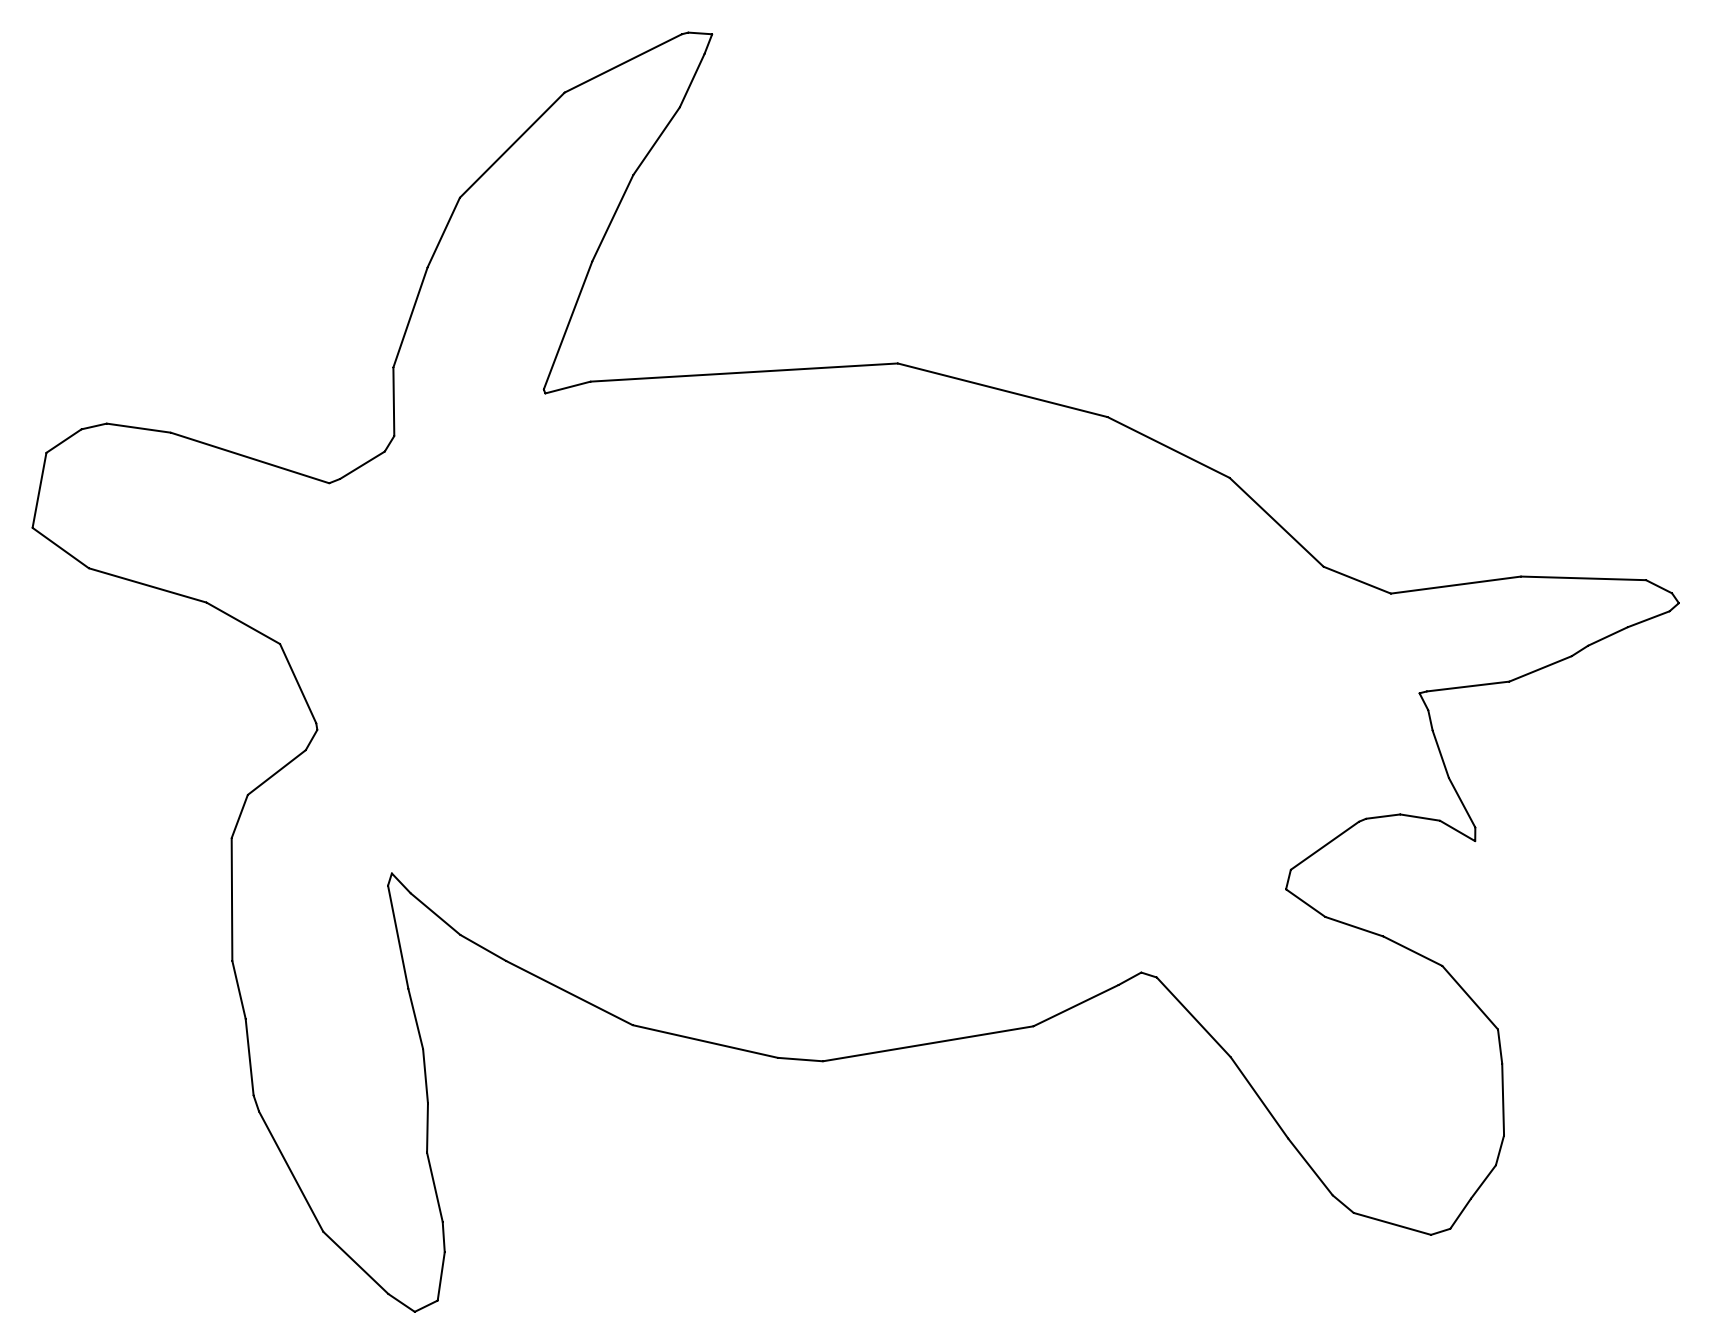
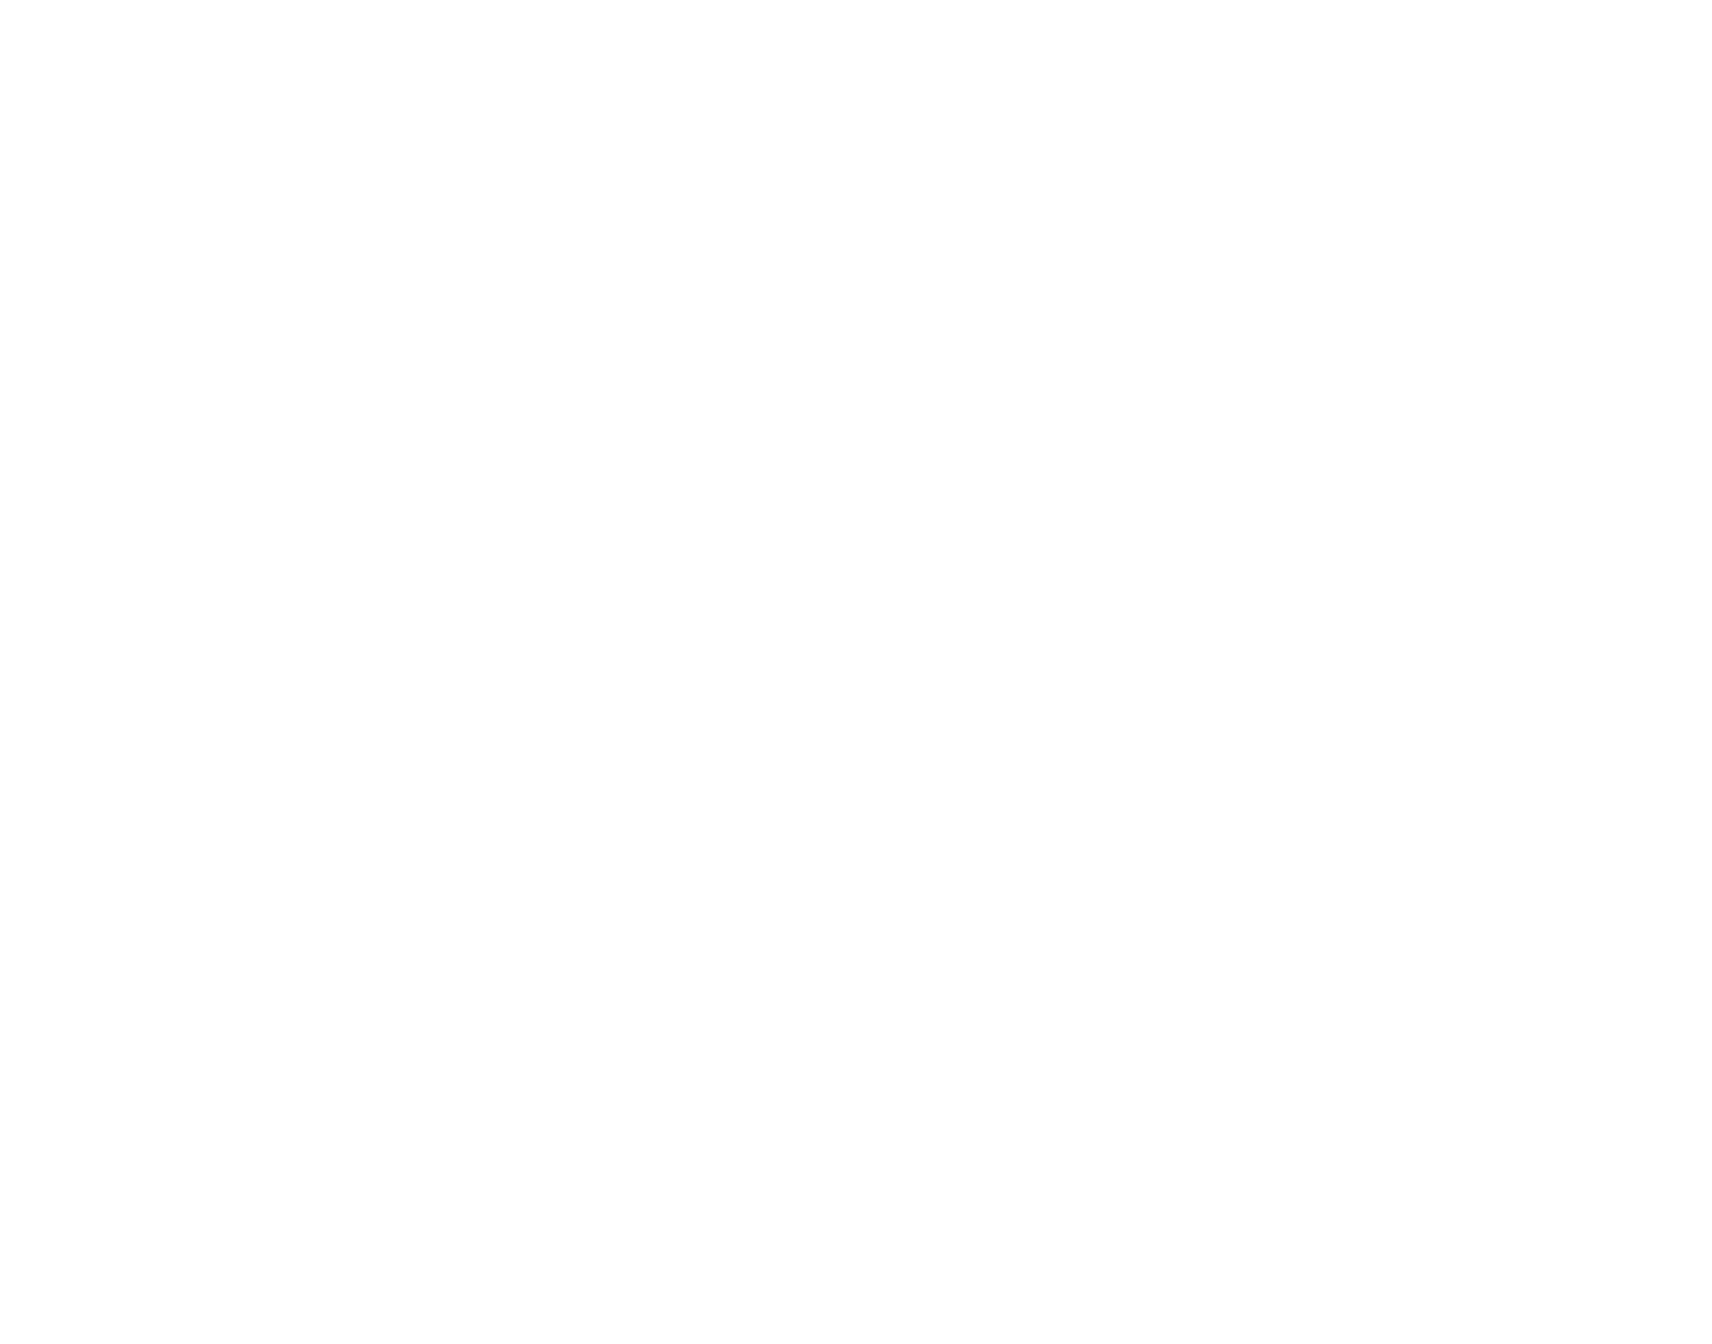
board edge: (688, 32) (712, 34) (679, 107) (633, 175) (592, 261) (543, 389) (545, 393) (590, 381) (897, 363) (1107, 417) (1229, 477) (1323, 566) (1390, 593) (1521, 576) (1646, 580) (1672, 593) (1678, 603) (1669, 611) (1627, 627) (1588, 645) (1571, 656) (1509, 681) (1419, 693) (1428, 710) (1432, 730) (1448, 777) (1475, 827) (1475, 841) (1440, 820) (1400, 814) (1366, 818) (1359, 821) (1290, 869) (1286, 889) (1325, 916) (1383, 936) (1442, 965) (1498, 1029) (1502, 1063) (1504, 1135) (1495, 1165) (1450, 1228) (1431, 1234) (1353, 1212) (1332, 1195) (1288, 1138) (1230, 1057) (1156, 977) (1141, 972) (1033, 1026) (822, 1061) (778, 1057) (632, 1025) (506, 961) (460, 934) (410, 893) (391, 873) (388, 885) (408, 988) (423, 1049) (427, 1103) (427, 1152) (442, 1222) (444, 1252) (437, 1300) (414, 1311) (388, 1294) (323, 1231) (259, 1111) (253, 1095) (245, 1018) (232, 960) (231, 838) (247, 794) (305, 750) (317, 729) (316, 723) (280, 644) (206, 602) (88, 568) (32, 527) (46, 452) (81, 429) (106, 423) (170, 432) (329, 483) (340, 478) (384, 451) (394, 436) (393, 367) (427, 267) (459, 197) (564, 92) (688, 32) -> none

